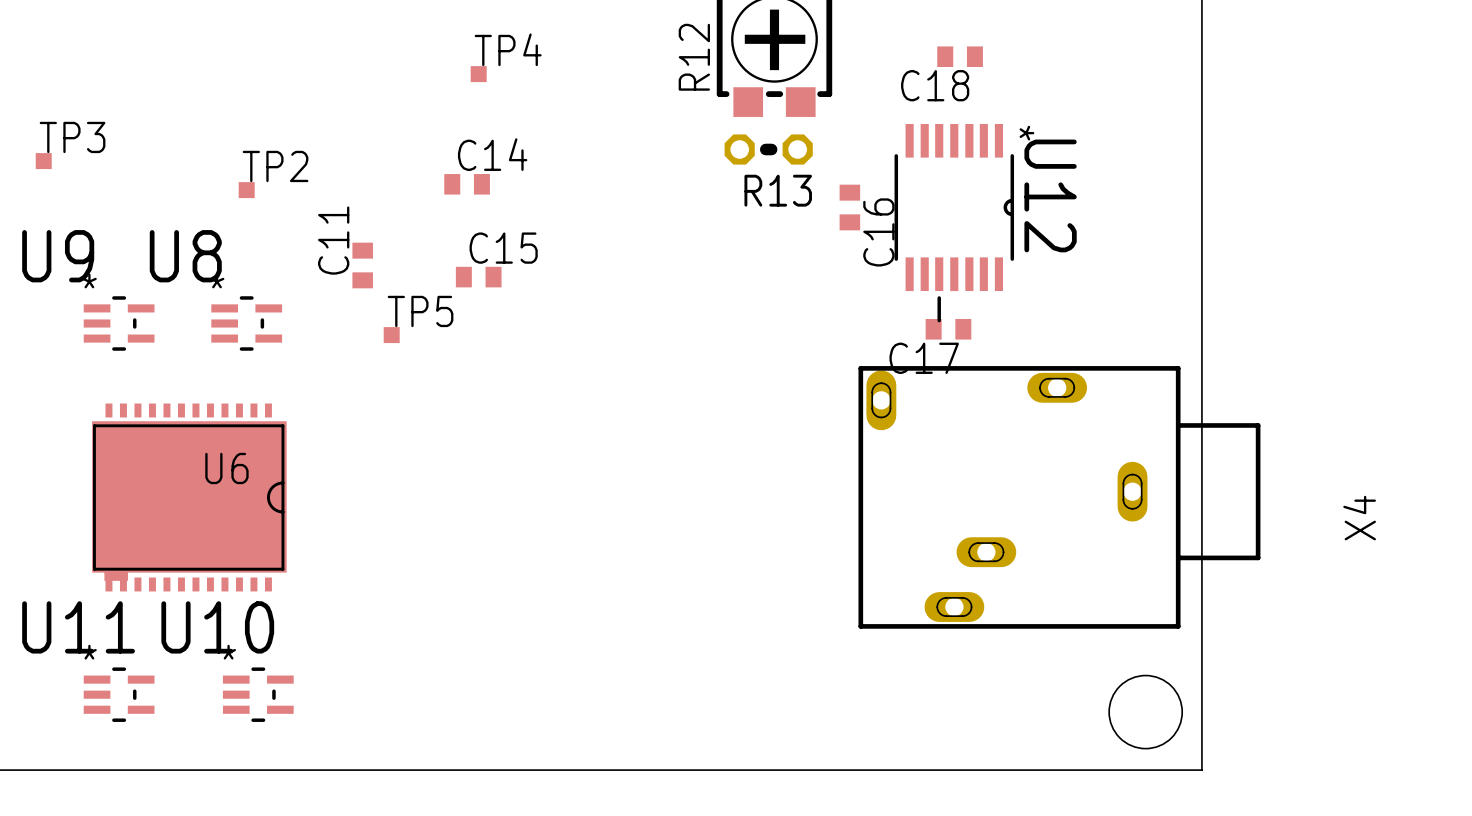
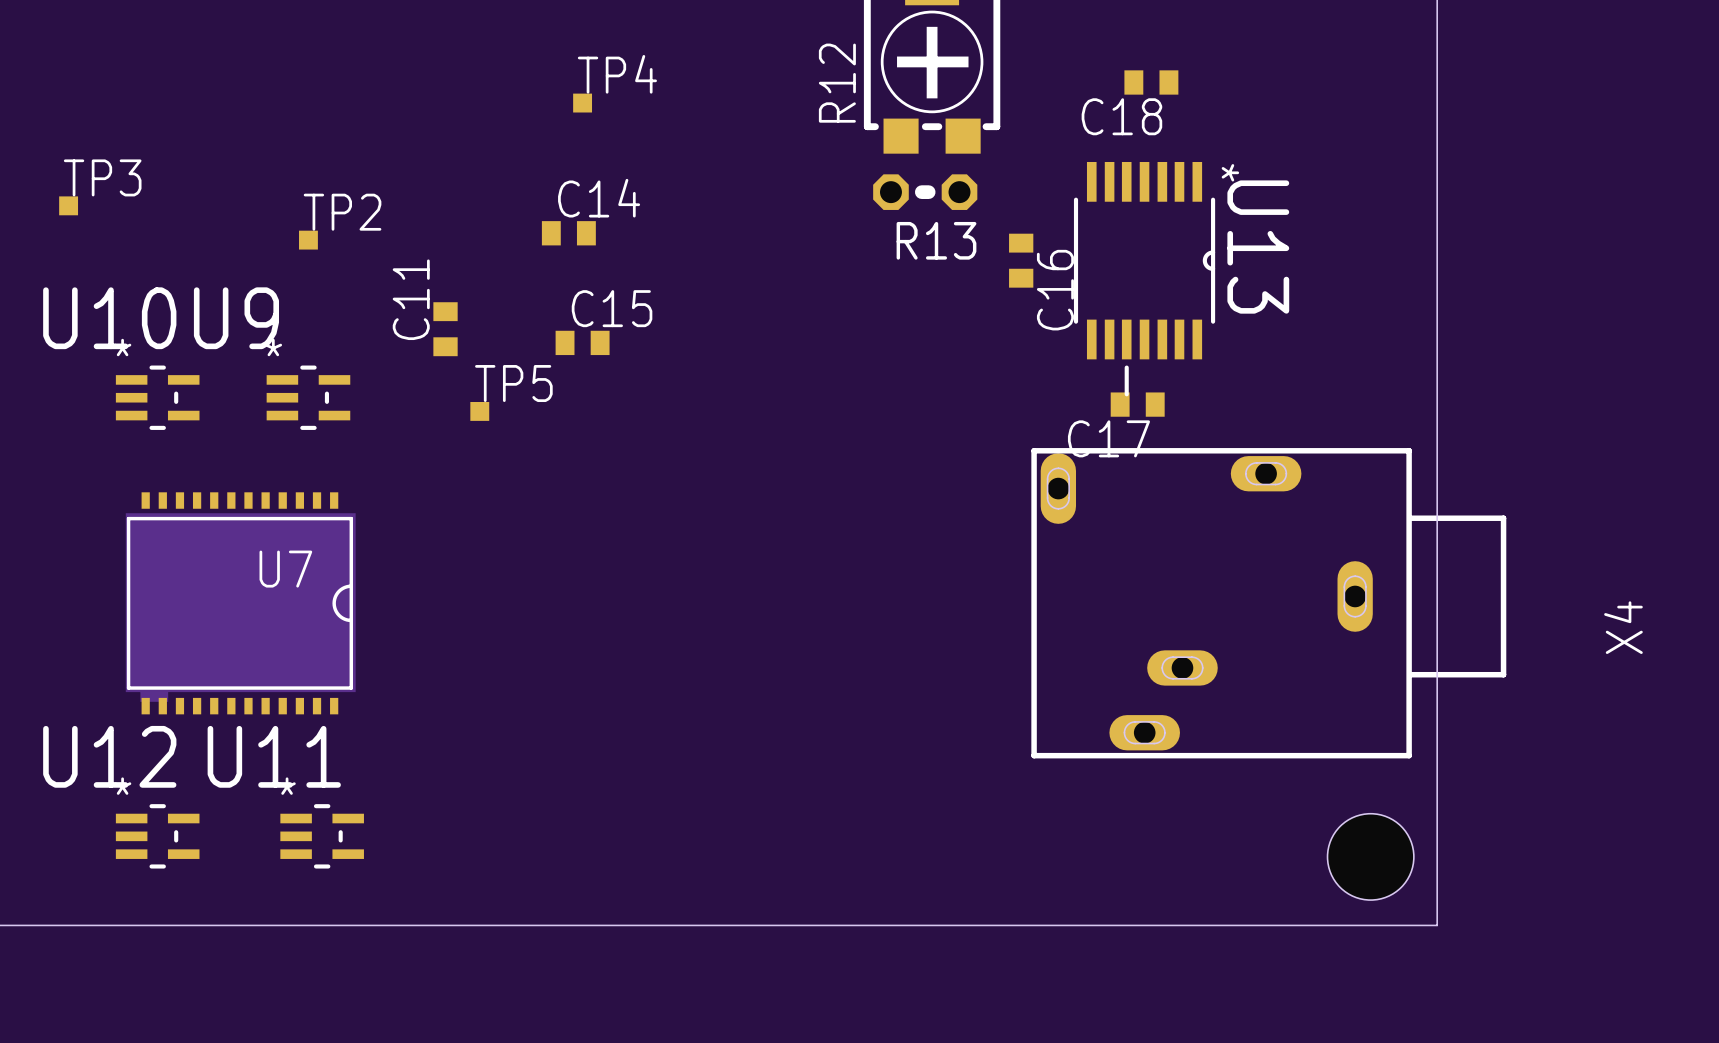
U12 name: U12 (1050, 195) -> U13 (1258, 247)
U9 name: U9 (58, 256) -> U10 (109, 318)
U8 name: U8 (185, 256) -> U9 (236, 318)
U6 name: U6 (226, 468) -> U7 (285, 569)
U11 name: U11 (78, 627) -> U12 (109, 756)
U10 name: U10 (217, 627) -> U11 (274, 756)

